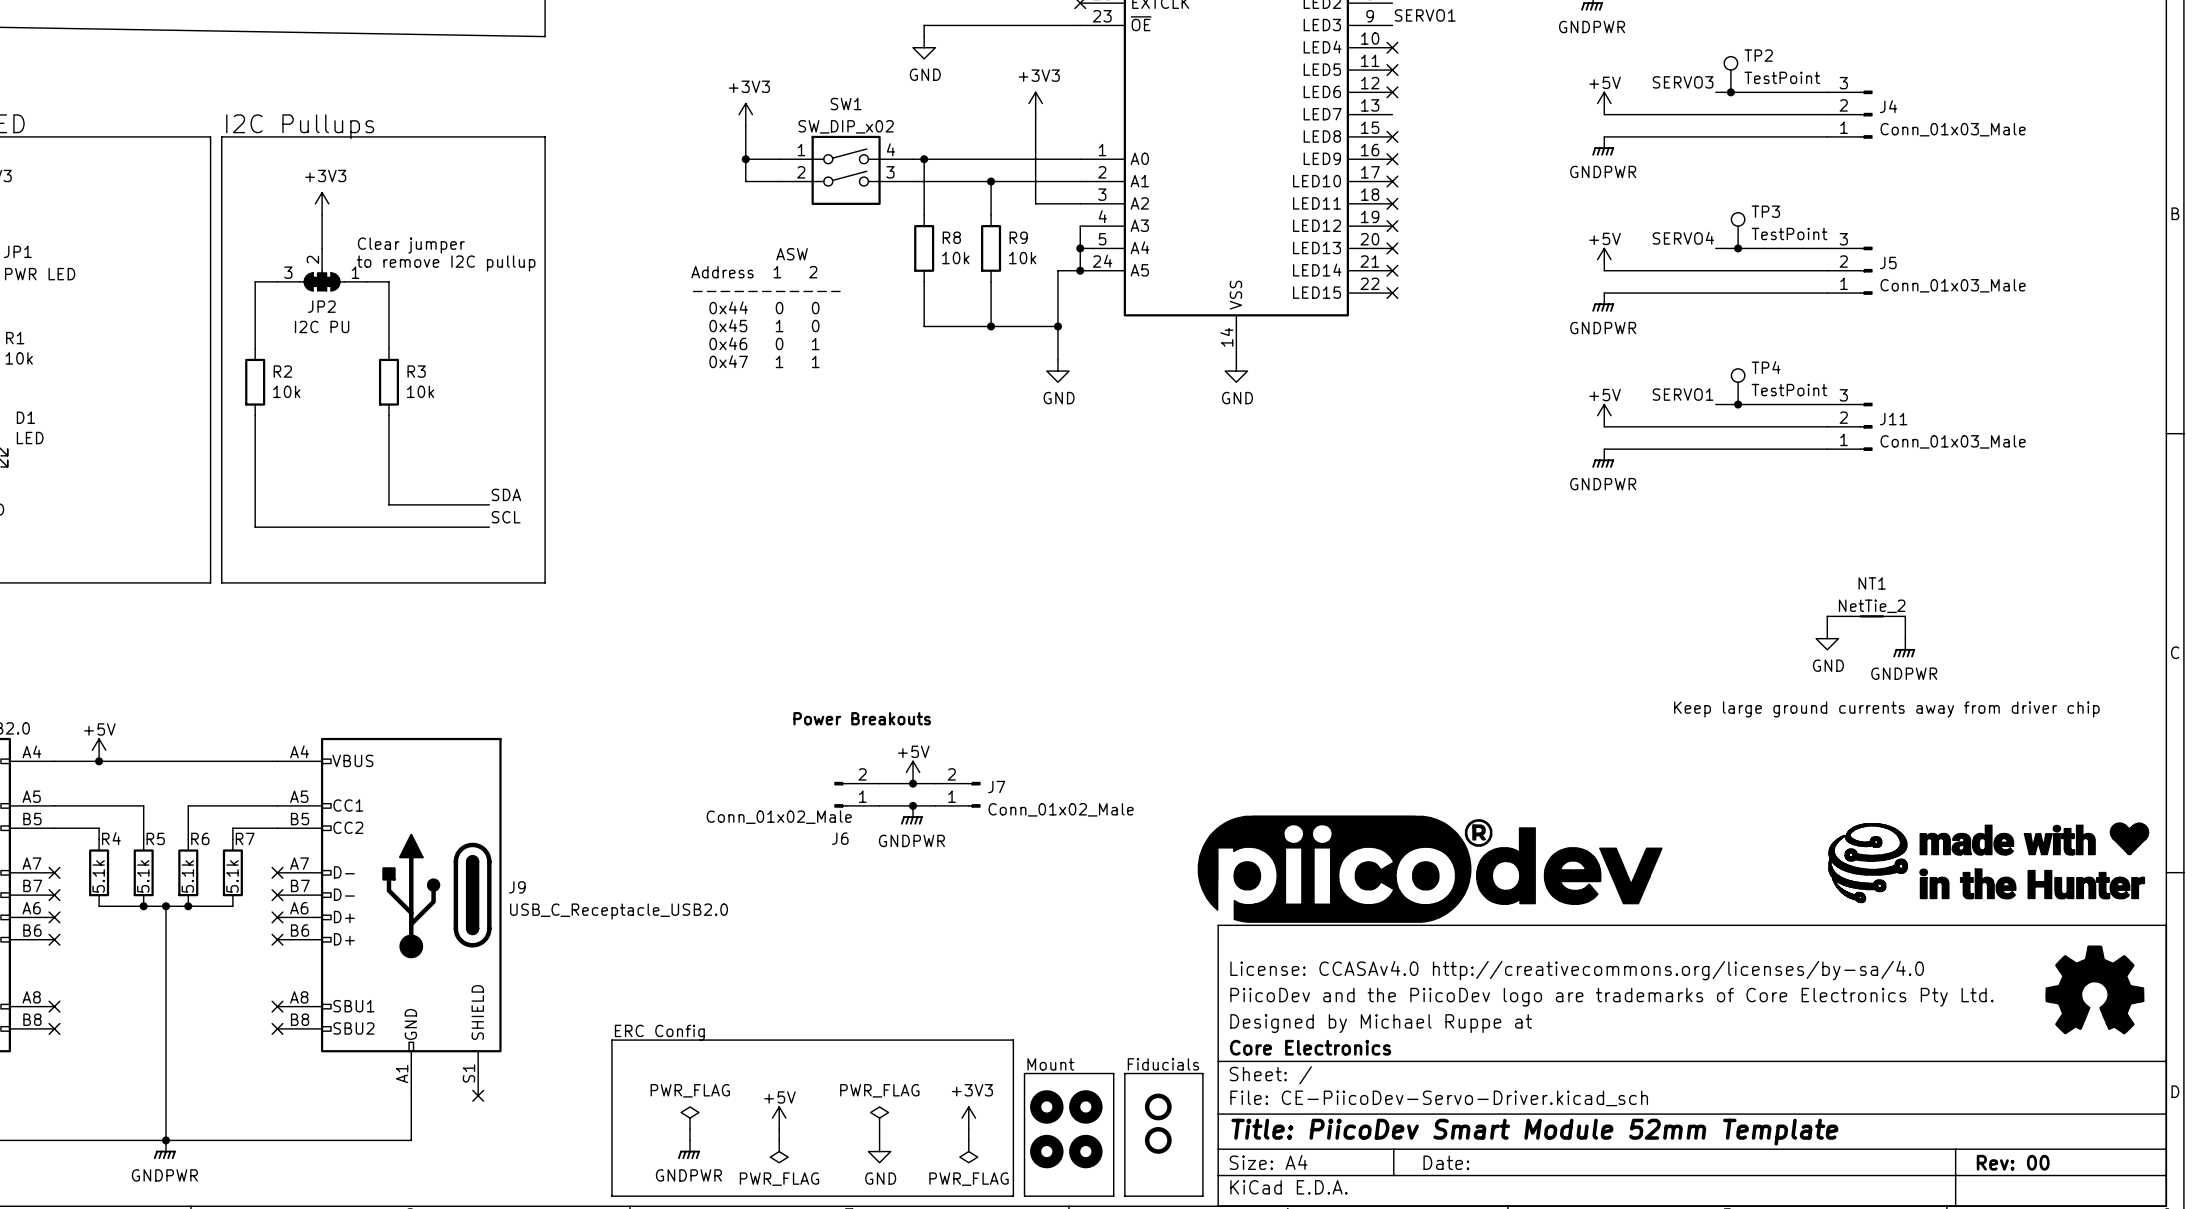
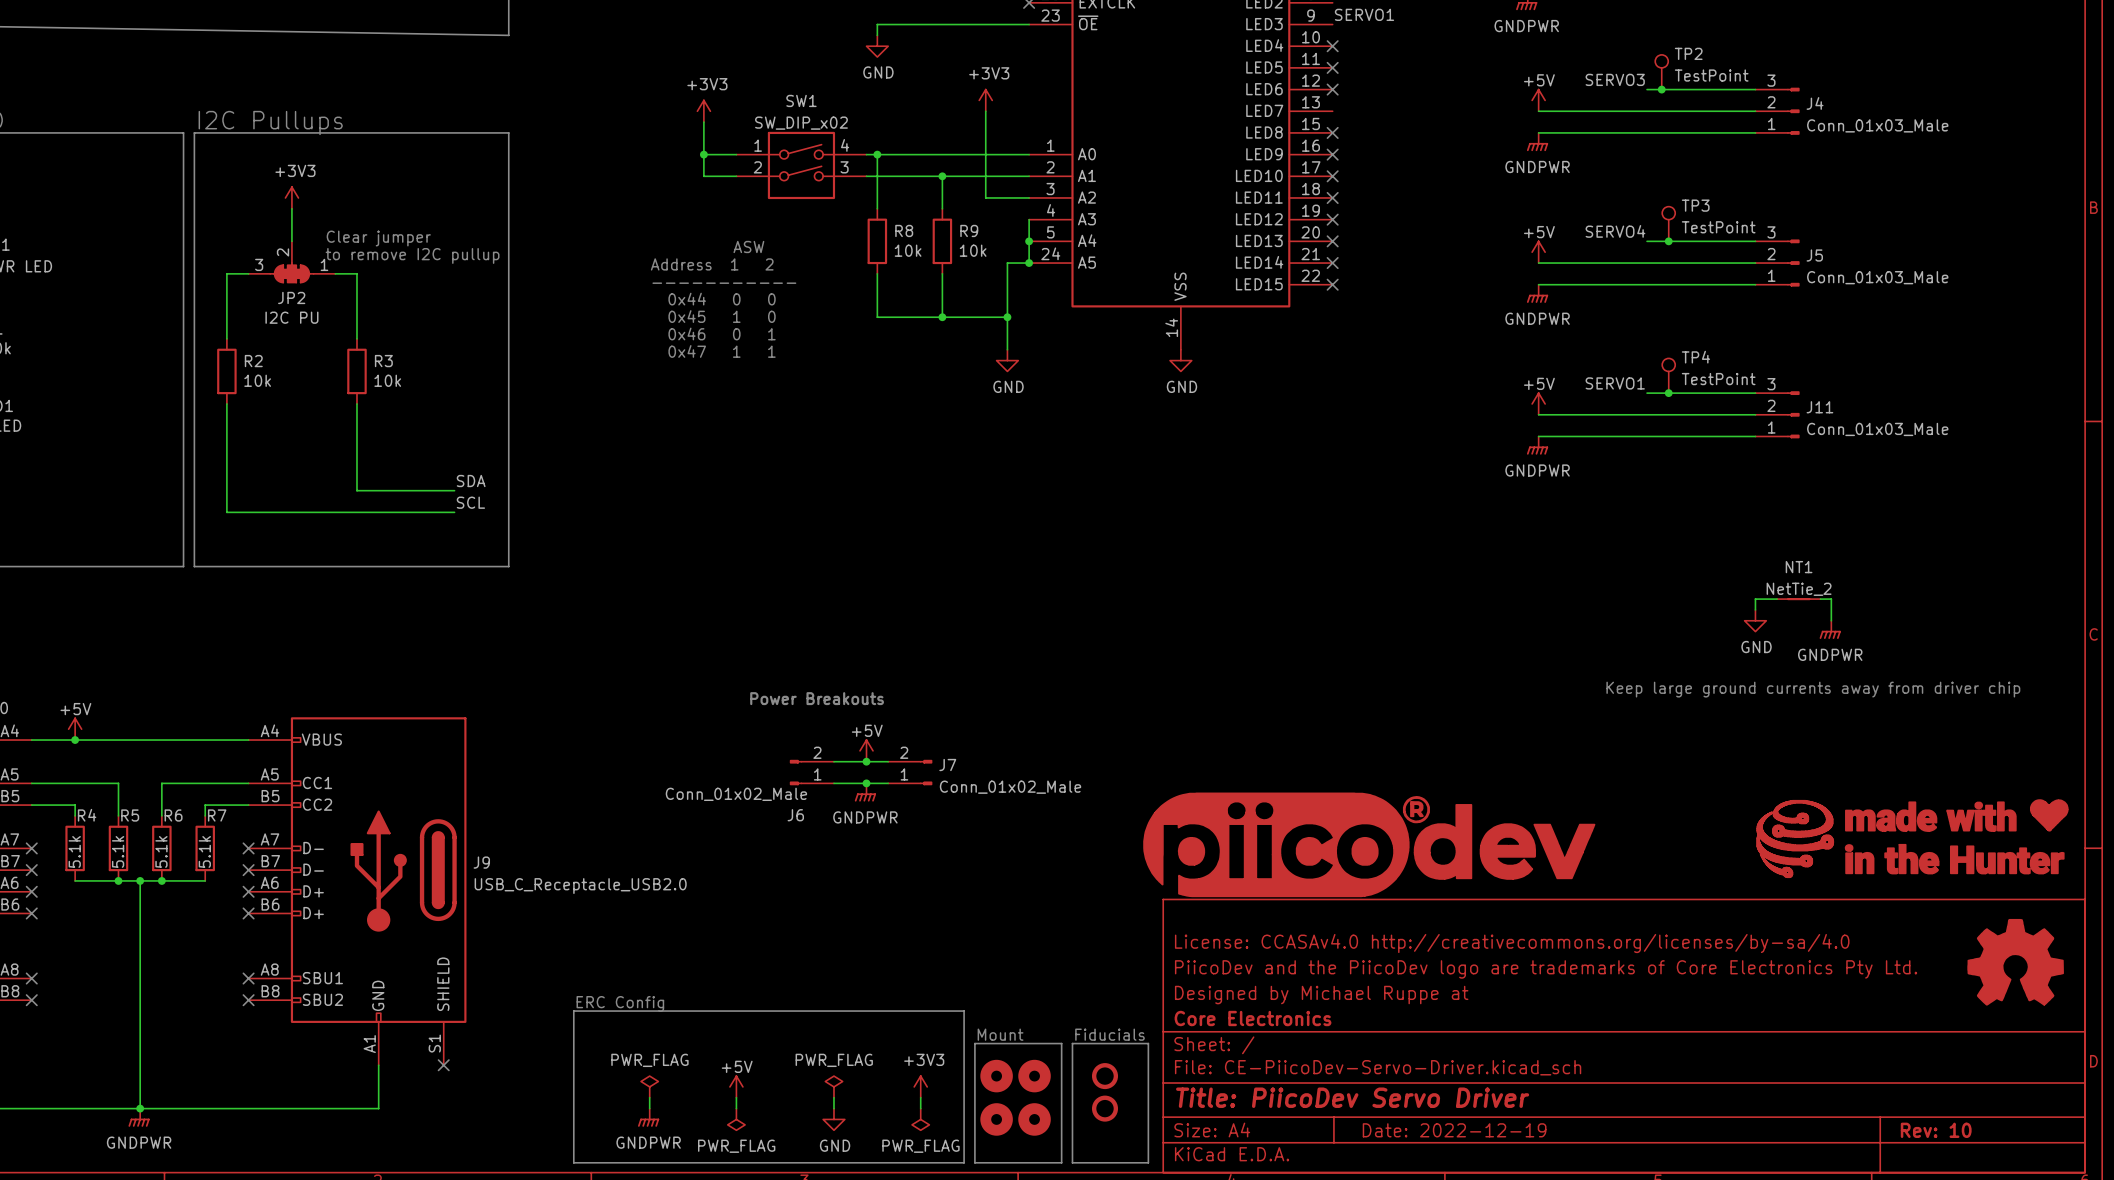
title block: Title: PiicoDev Smart Module 52mm Template (1534, 1132) -> Title: PiicoDev Servo Driver (1352, 1097)
title block: Date: (1446, 1162) -> Date: 2022-12-19 (1454, 1130)
title block: Rev: 00 (2013, 1162) -> Rev: 10 (1936, 1130)

